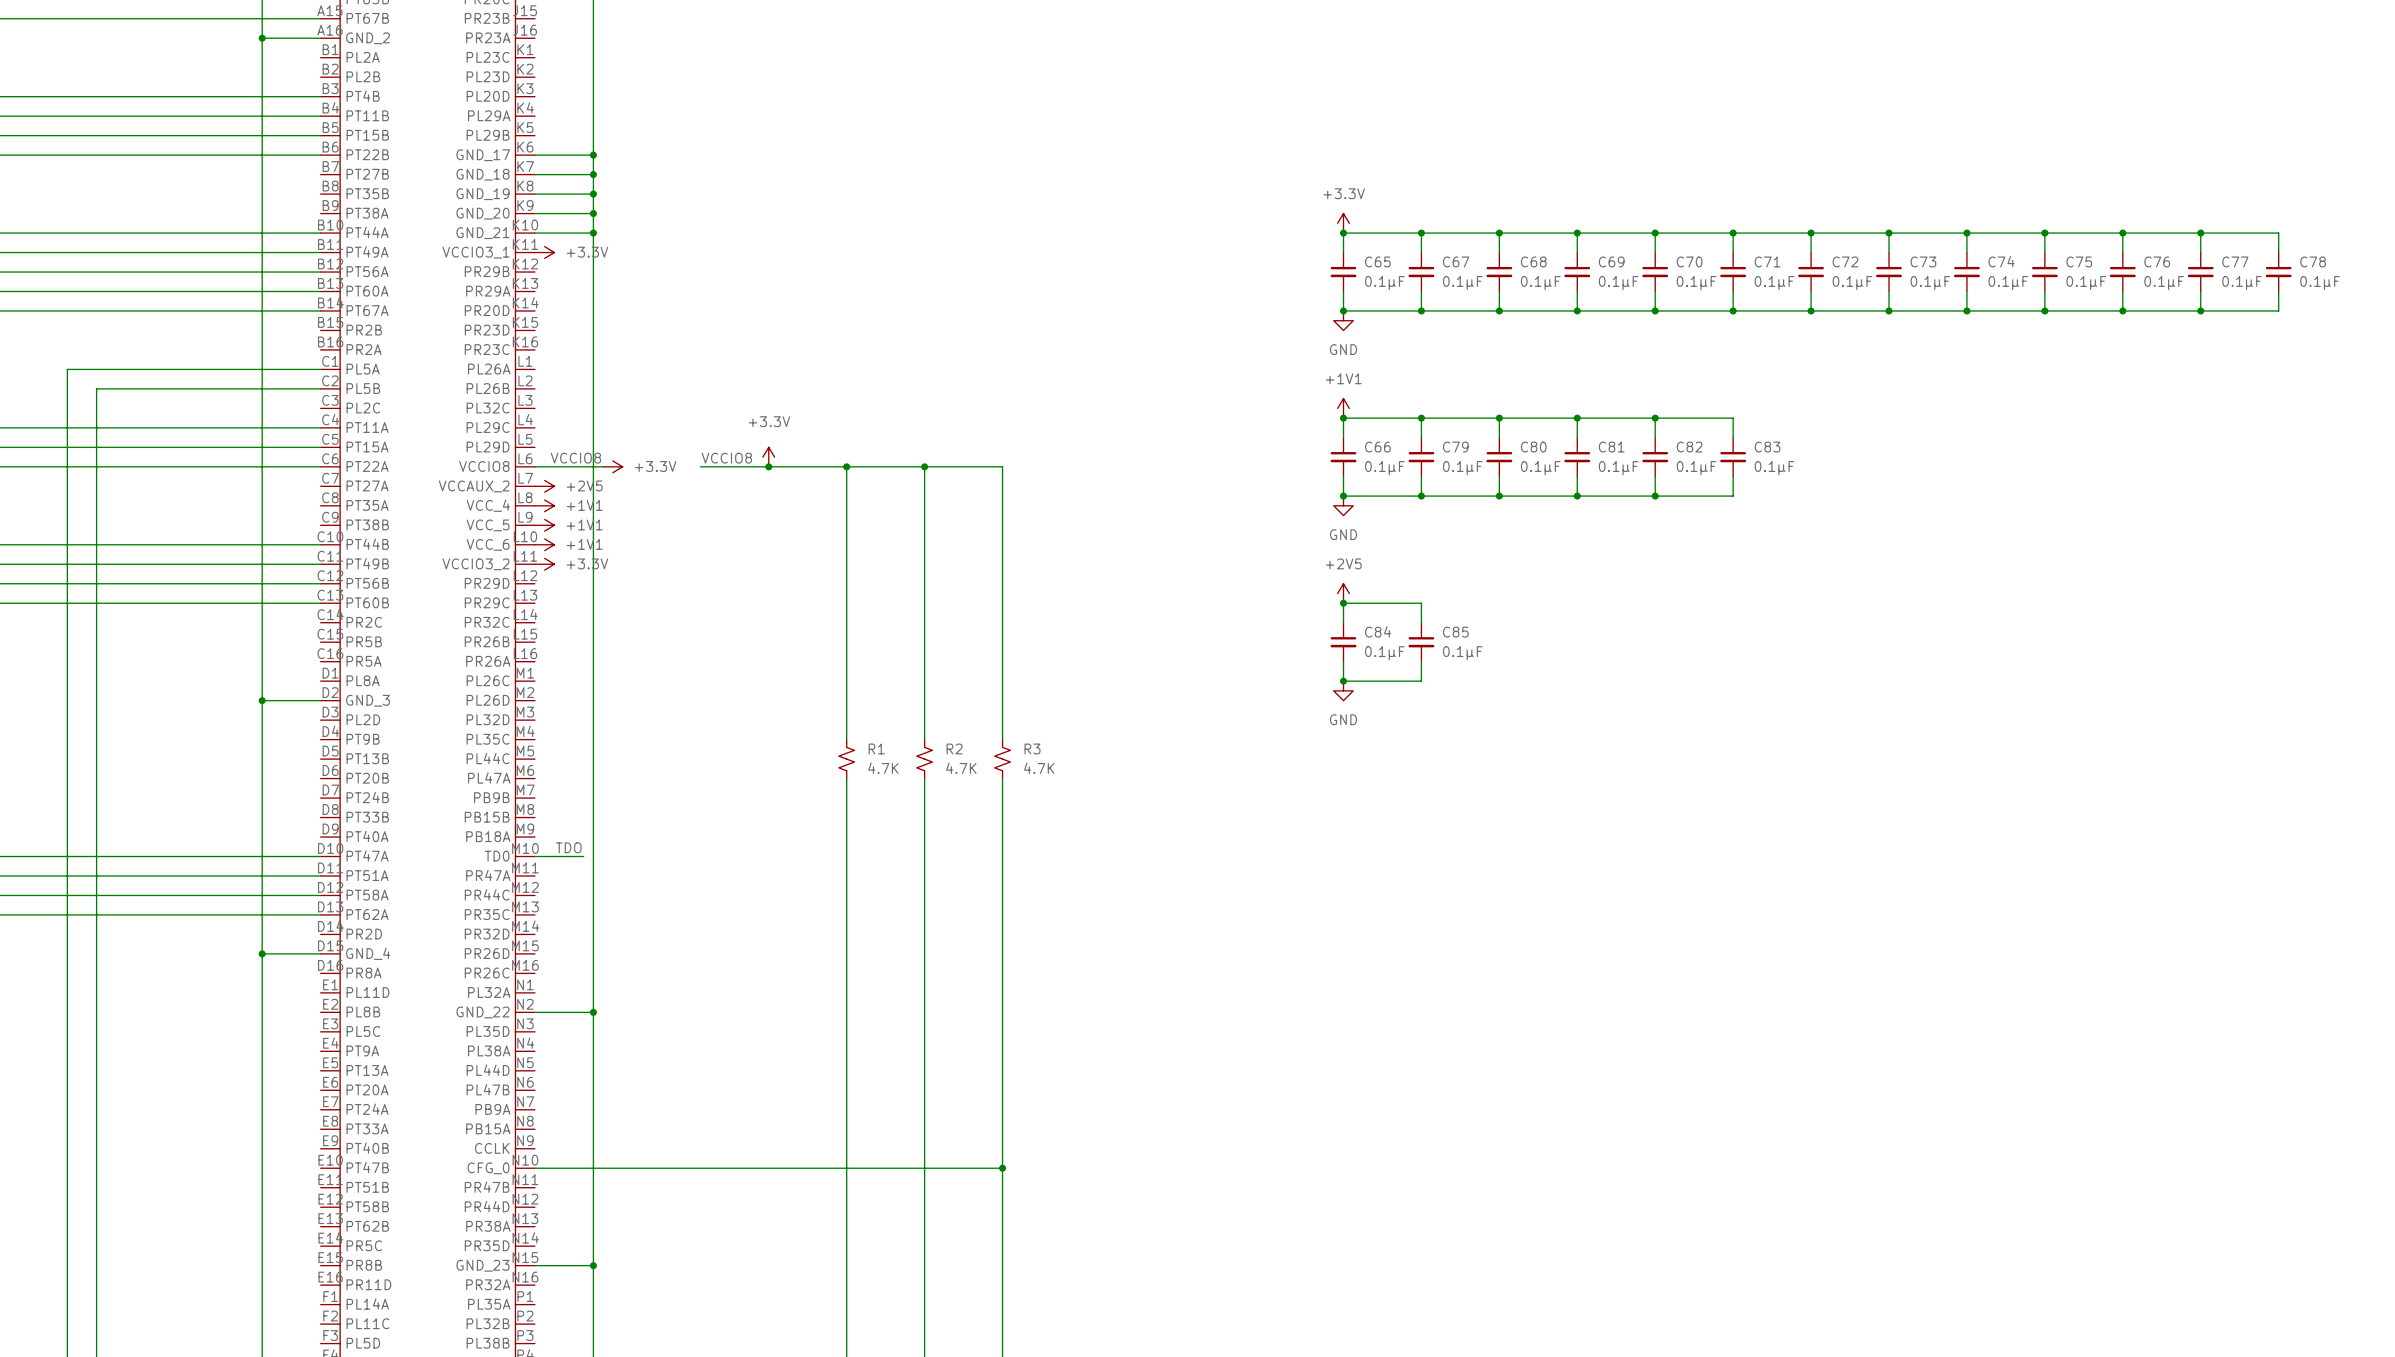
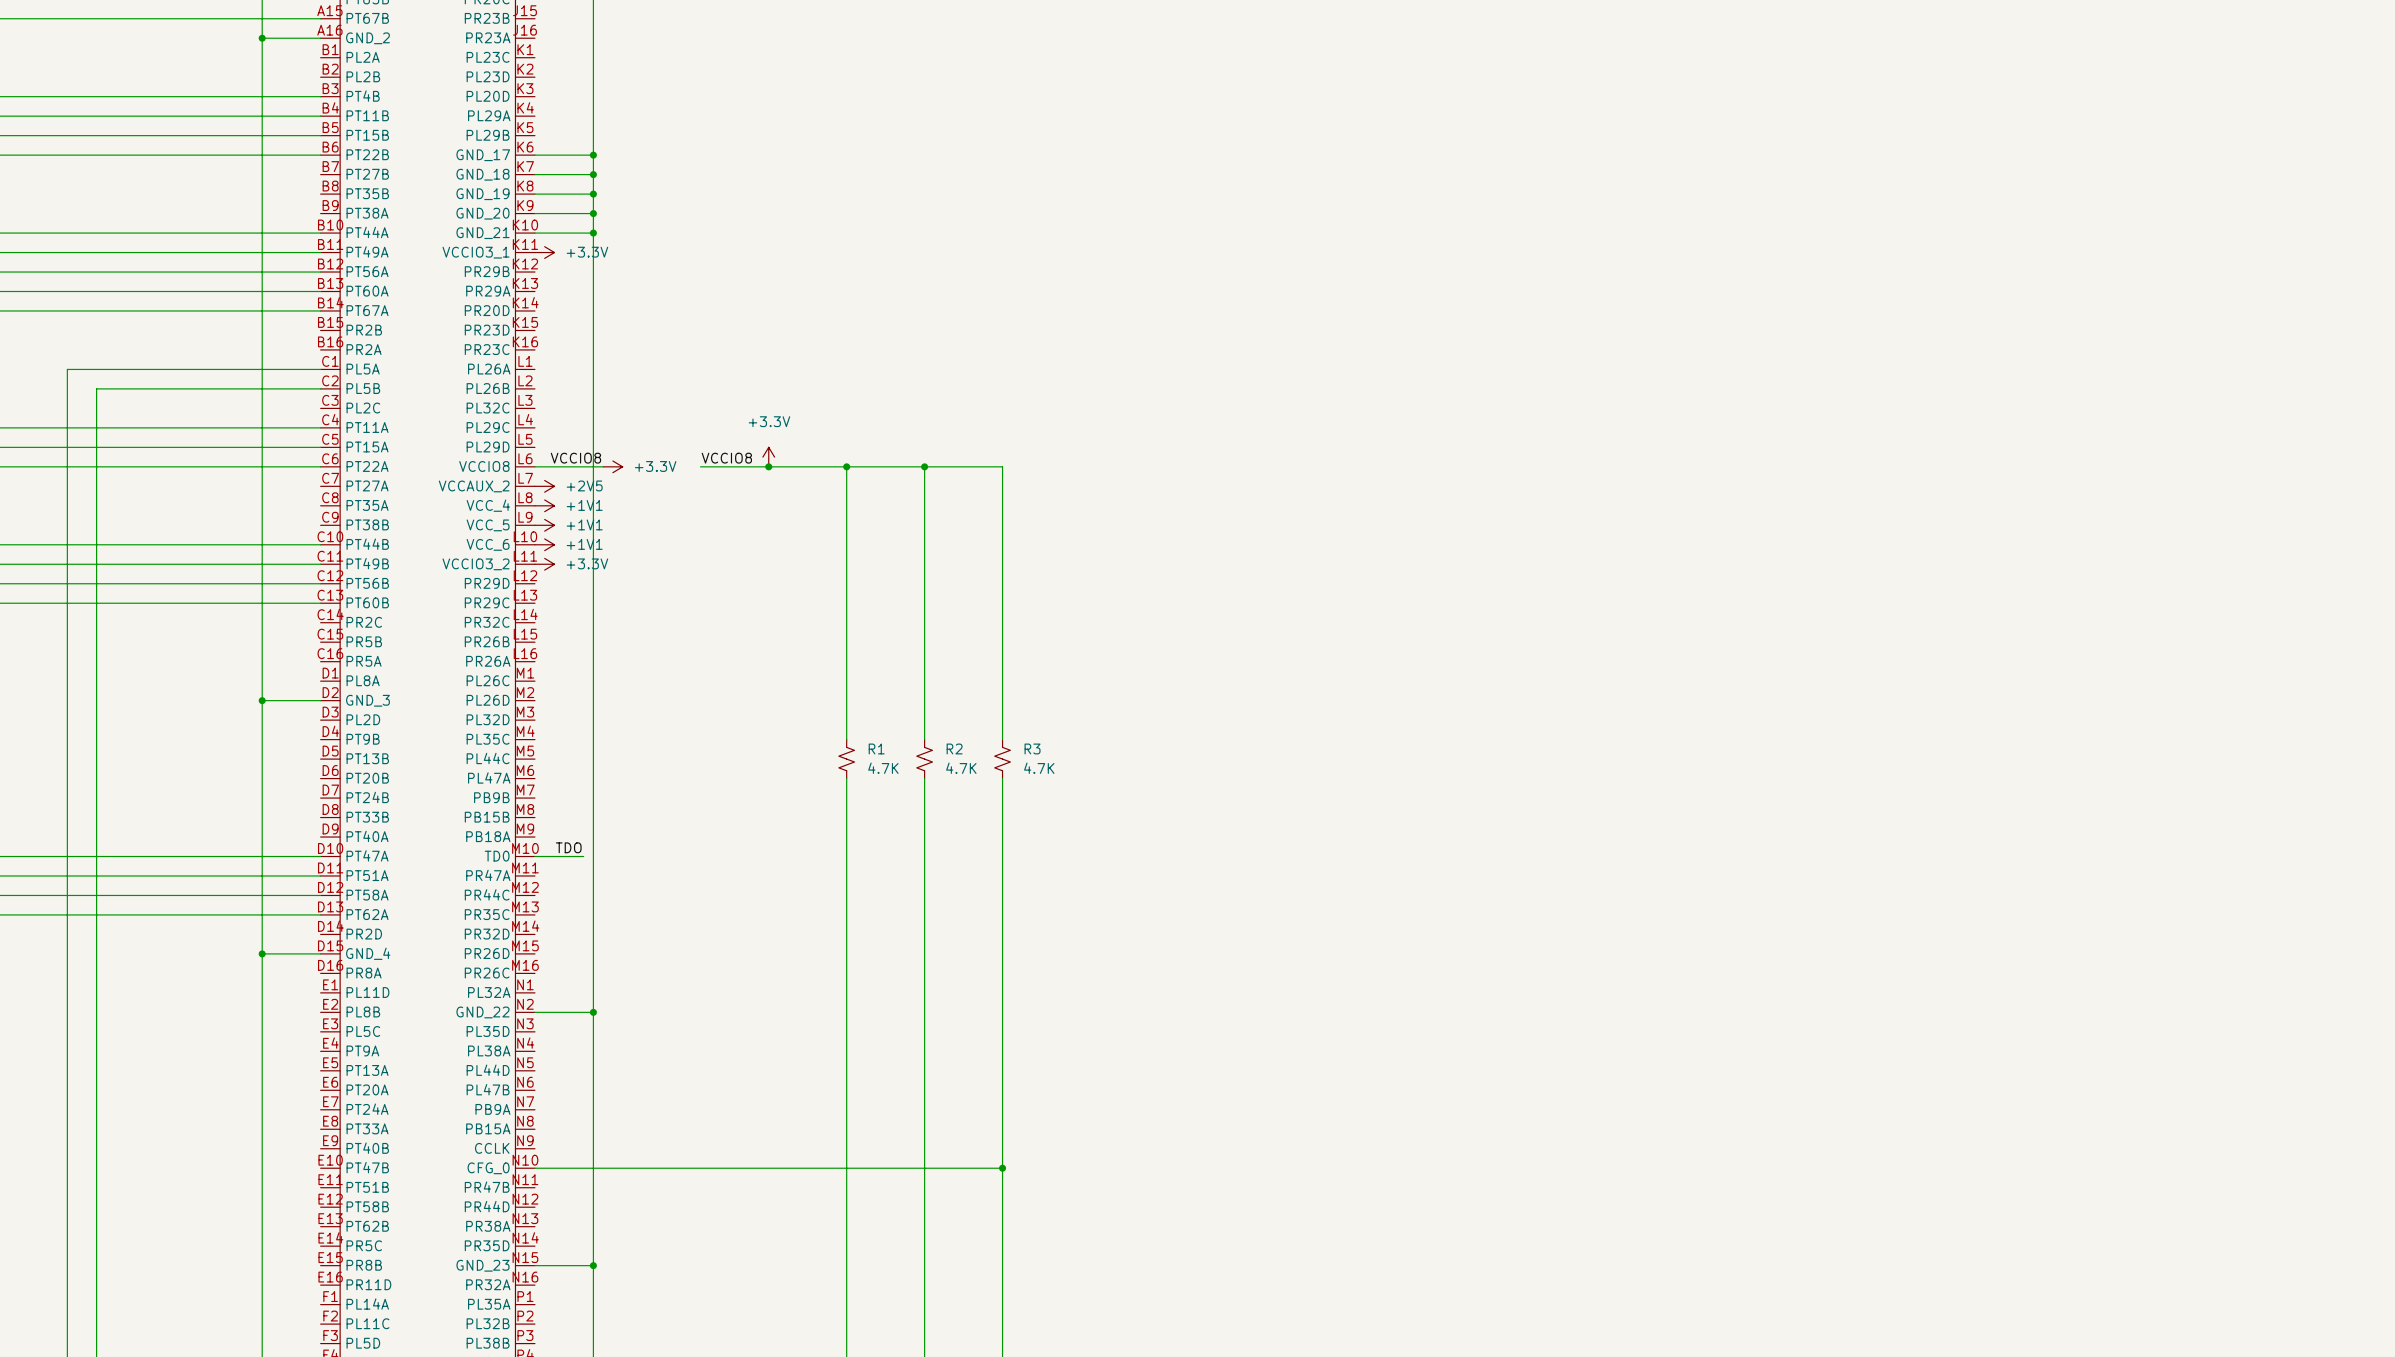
power symbol: +3.3V (1343, 223) -> none
junction: (1343, 233) -> none
wire: (1421, 233) (1421, 252) -> none
junction: (1421, 233) -> none
wire: (1499, 233) (1499, 252) -> none
junction: (1499, 233) -> none
wire: (1577, 233) (1577, 252) -> none
junction: (1577, 233) -> none
wire: (1655, 233) (1655, 252) -> none
junction: (1655, 233) -> none
wire: (1733, 233) (1733, 252) -> none
junction: (1733, 233) -> none
wire: (1811, 233) (1811, 252) -> none
junction: (1811, 233) -> none
wire: (1889, 233) (1889, 252) -> none
junction: (1889, 233) -> none
wire: (1966, 233) (1966, 252) -> none
junction: (1966, 233) -> none
wire: (2044, 233) (2044, 252) -> none
junction: (2044, 233) -> none
wire: (2122, 233) (2122, 252) -> none
junction: (2122, 233) -> none
wire: (2200, 233) (2200, 252) -> none
junction: (2200, 233) -> none
wire: (1343, 252) (1343, 233) (2278, 233) (2278, 252) -> none
C65: 0.1μF (1343, 272) -> none
C67: 0.1μF (1421, 272) -> none
C68: 0.1μF (1499, 272) -> none
C69: 0.1μF (1577, 272) -> none
C70: 0.1μF (1655, 272) -> none
C71: 0.1μF (1733, 272) -> none
C72: 0.1μF (1811, 272) -> none
C73: 0.1μF (1889, 272) -> none
C74: 0.1μF (1966, 272) -> none
C75: 0.1μF (2044, 272) -> none
C76: 0.1μF (2122, 272) -> none
C77: 0.1μF (2200, 272) -> none
C78: 0.1μF (2278, 272) -> none
wire: (1343, 291) (1343, 310) (2278, 310) (2278, 291) -> none
wire: (1421, 291) (1421, 310) -> none
wire: (1499, 291) (1499, 310) -> none
wire: (1577, 291) (1577, 310) -> none
wire: (1655, 291) (1655, 310) -> none
wire: (1733, 291) (1733, 310) -> none
wire: (1811, 291) (1811, 310) -> none
wire: (1889, 291) (1889, 310) -> none
wire: (1966, 291) (1966, 310) -> none
wire: (2044, 291) (2044, 310) -> none
wire: (2122, 291) (2122, 310) -> none
wire: (2200, 291) (2200, 310) -> none
junction: (1343, 310) -> none
junction: (1421, 310) -> none
junction: (1499, 310) -> none
junction: (1577, 310) -> none
junction: (1655, 310) -> none
junction: (1733, 310) -> none
junction: (1811, 310) -> none
junction: (1889, 310) -> none
junction: (1966, 310) -> none
junction: (2044, 310) -> none
junction: (2122, 310) -> none
junction: (2200, 310) -> none
power symbol: GND (1343, 320) -> none
power symbol: +1V1 (1343, 408) -> none
junction: (1343, 418) -> none
wire: (1421, 418) (1421, 437) -> none
junction: (1421, 418) -> none
wire: (1499, 418) (1499, 437) -> none
junction: (1499, 418) -> none
wire: (1577, 418) (1577, 437) -> none
junction: (1577, 418) -> none
wire: (1655, 418) (1655, 437) -> none
junction: (1655, 418) -> none
wire: (1343, 437) (1343, 418) (1733, 418) (1733, 437) -> none
C66: 0.1μF (1343, 457) -> none
C79: 0.1μF (1421, 457) -> none
C80: 0.1μF (1499, 457) -> none
C81: 0.1μF (1577, 457) -> none
C82: 0.1μF (1655, 457) -> none
C83: 0.1μF (1733, 457) -> none
wire: (1343, 476) (1343, 496) (1733, 496) (1733, 476) -> none
wire: (1421, 476) (1421, 496) -> none
wire: (1499, 476) (1499, 496) -> none
wire: (1577, 476) (1577, 496) -> none
wire: (1655, 476) (1655, 496) -> none
junction: (1343, 496) -> none
junction: (1421, 496) -> none
junction: (1499, 496) -> none
junction: (1577, 496) -> none
junction: (1655, 496) -> none
power symbol: GND (1343, 505) -> none
power symbol: +2V5 (1343, 593) -> none
junction: (1343, 603) -> none
wire: (1343, 622) (1343, 603) (1421, 603) (1421, 622) -> none
C84: 0.1μF (1343, 642) -> none
C85: 0.1μF (1421, 642) -> none
wire: (1343, 661) (1343, 681) (1421, 681) (1421, 661) -> none
junction: (1343, 681) -> none
power symbol: GND (1343, 690) -> none

